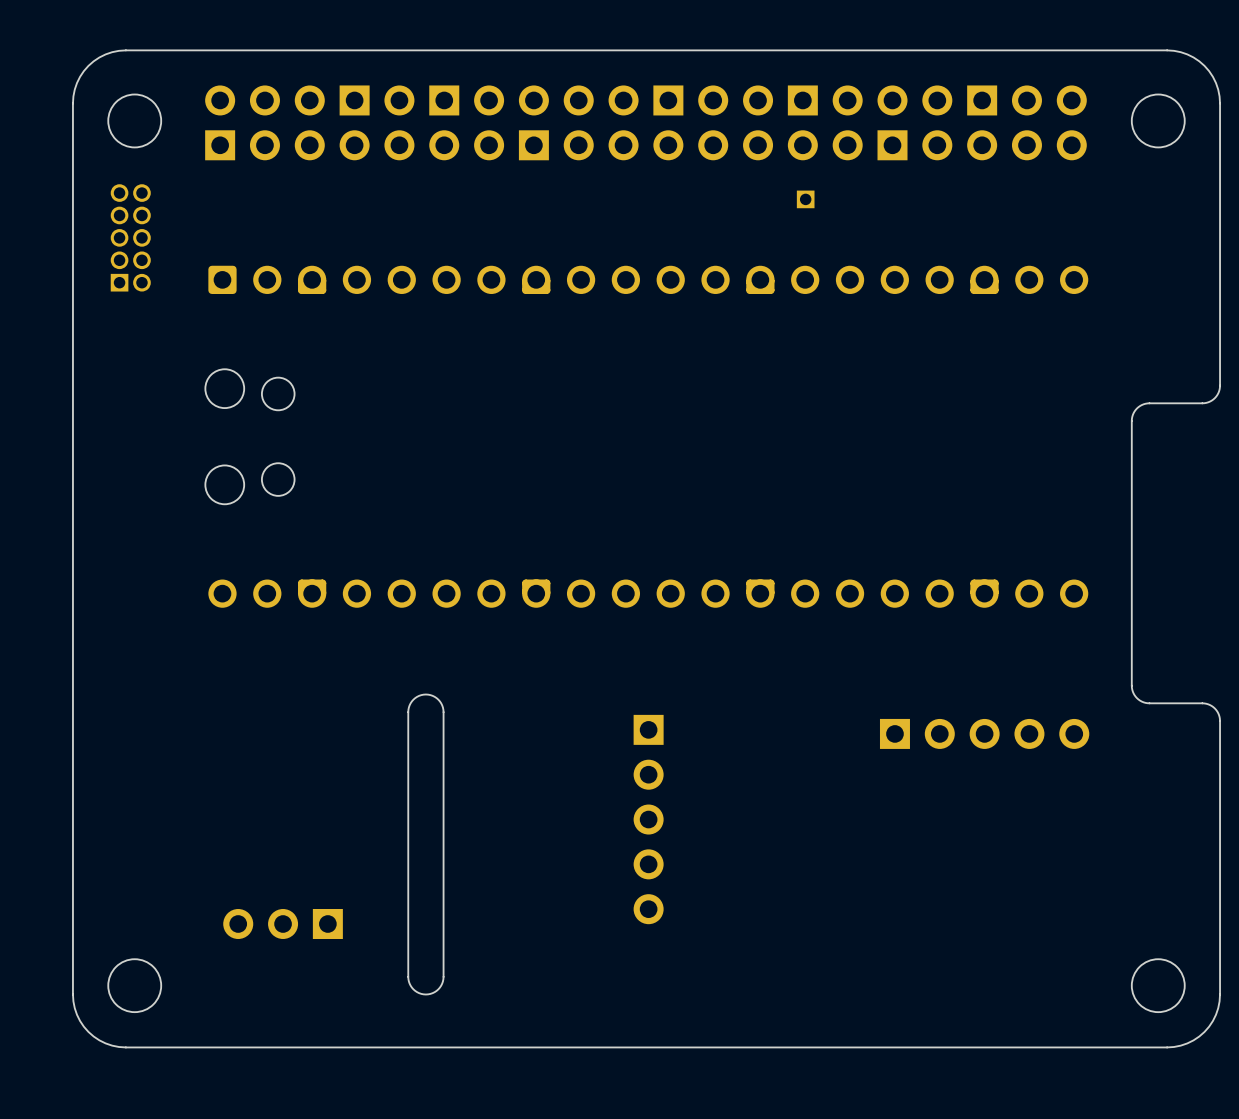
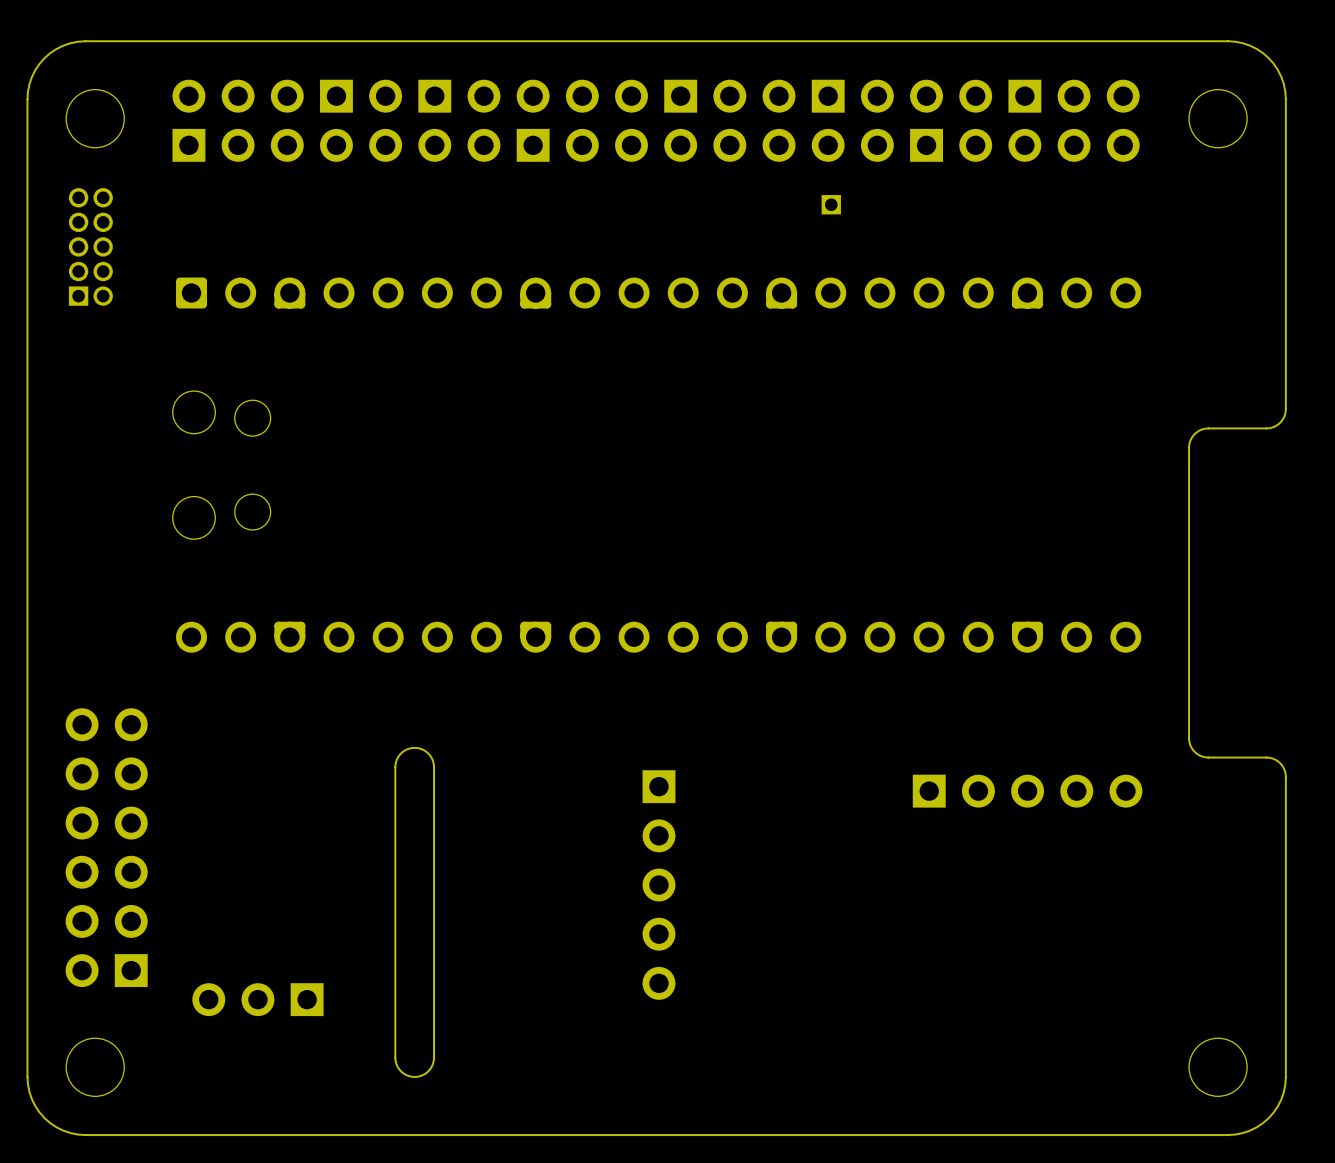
part: none -> (106, 847)

